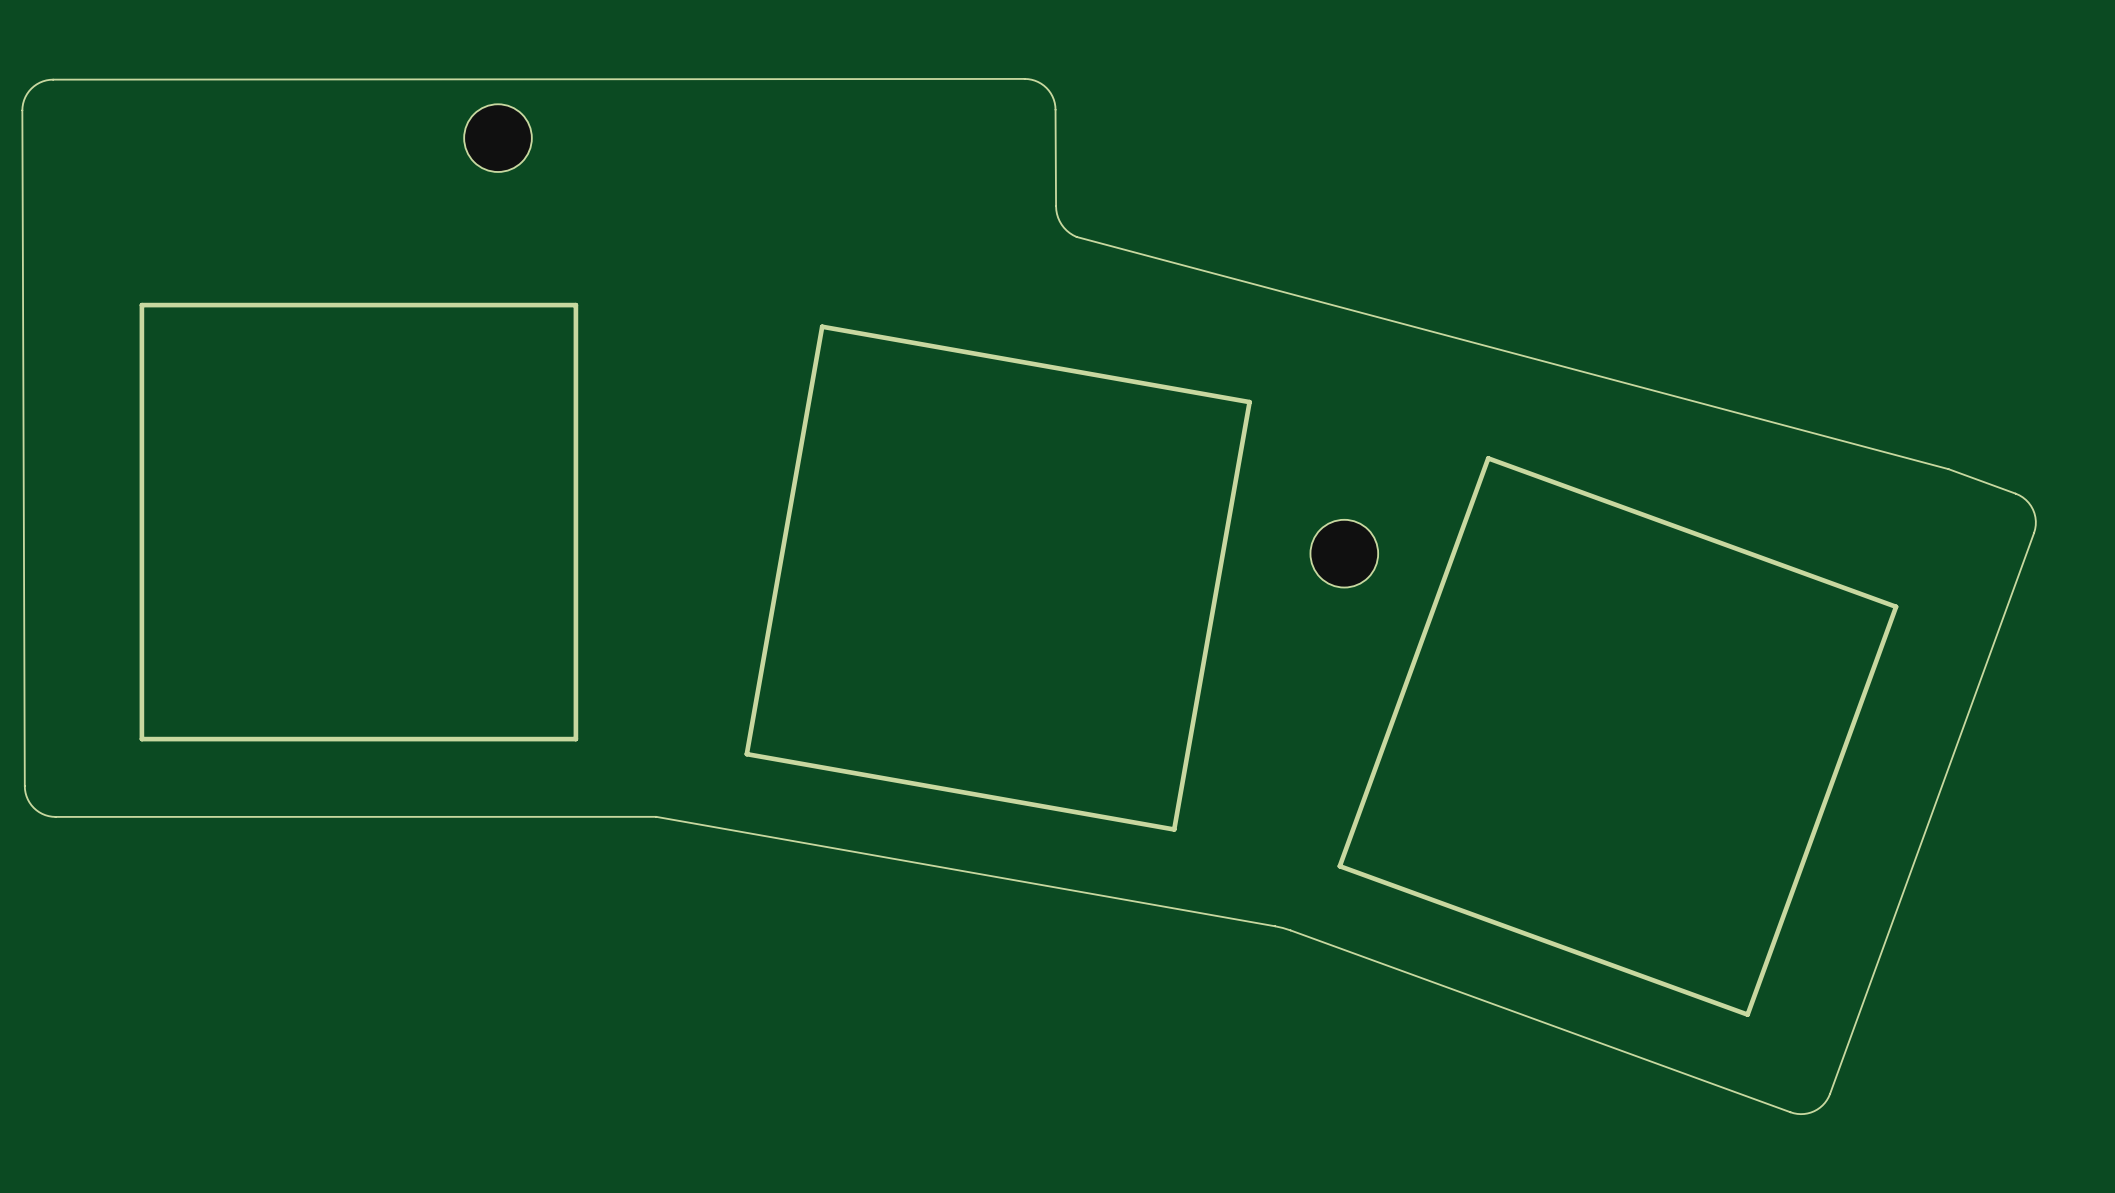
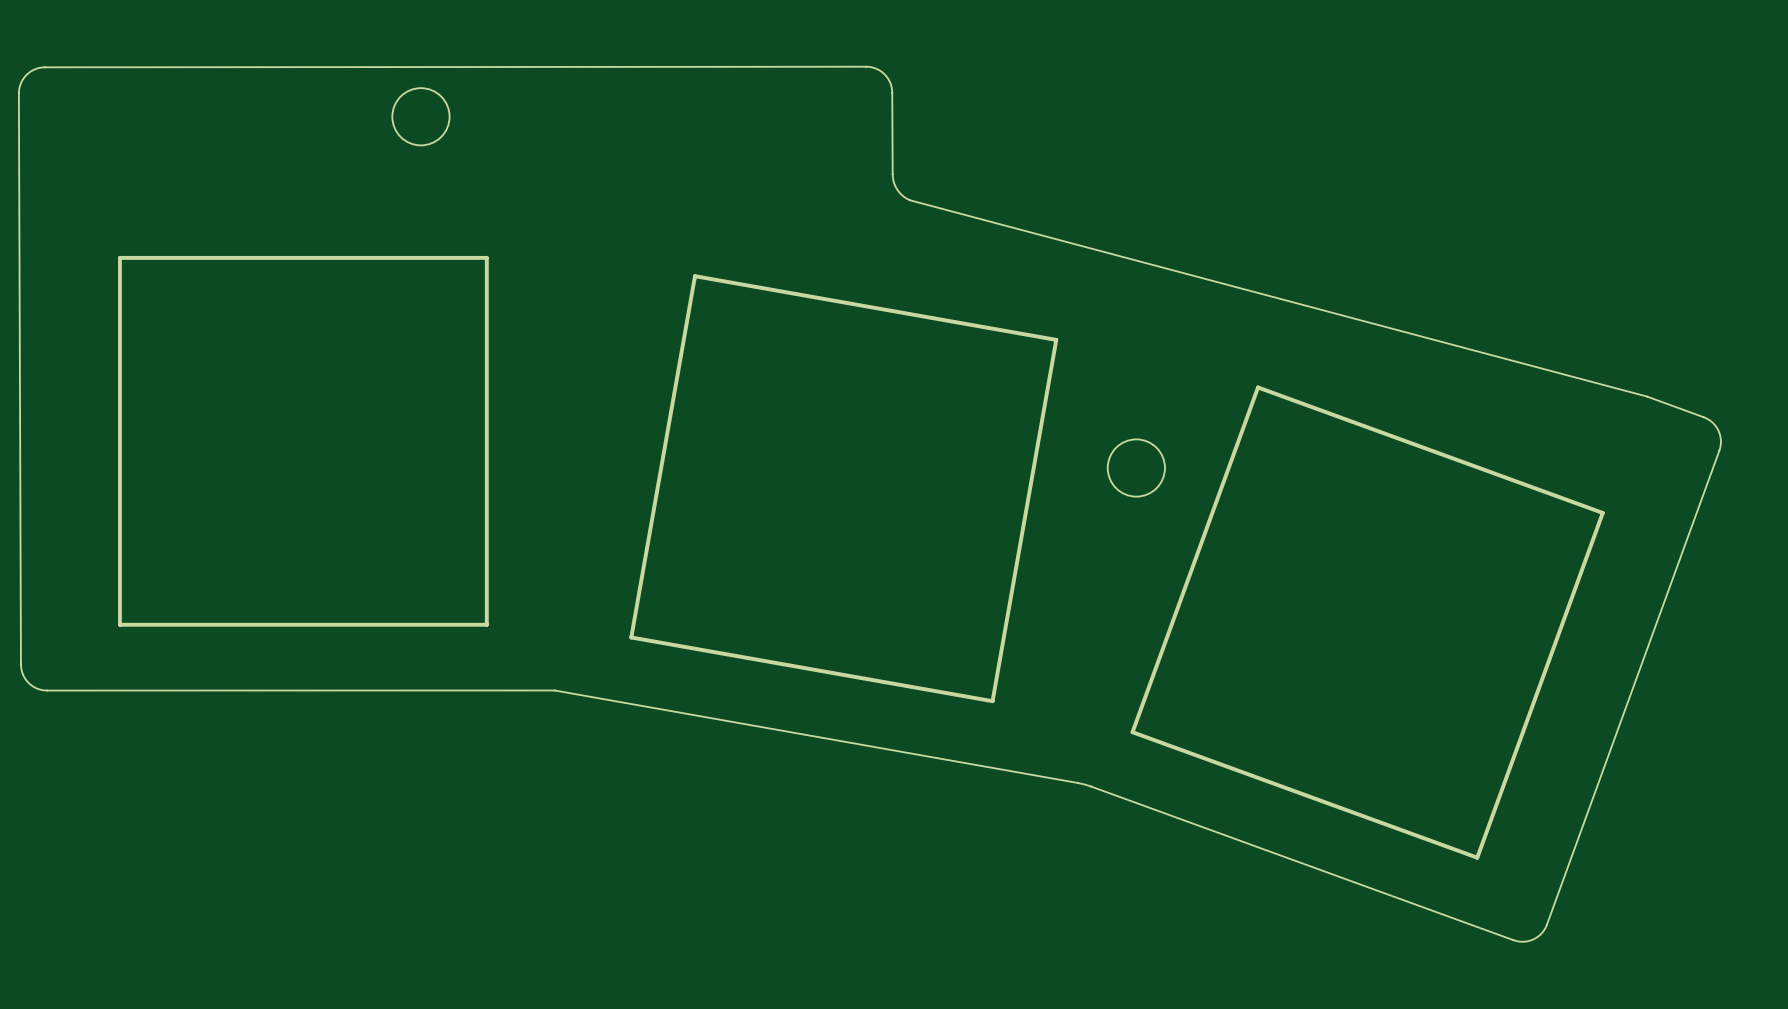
drawing: none -> [392, 88, 450, 146]
part: (498, 138) -> none
drawing: none -> [1107, 439, 1166, 497]
part: (1344, 553) -> none

